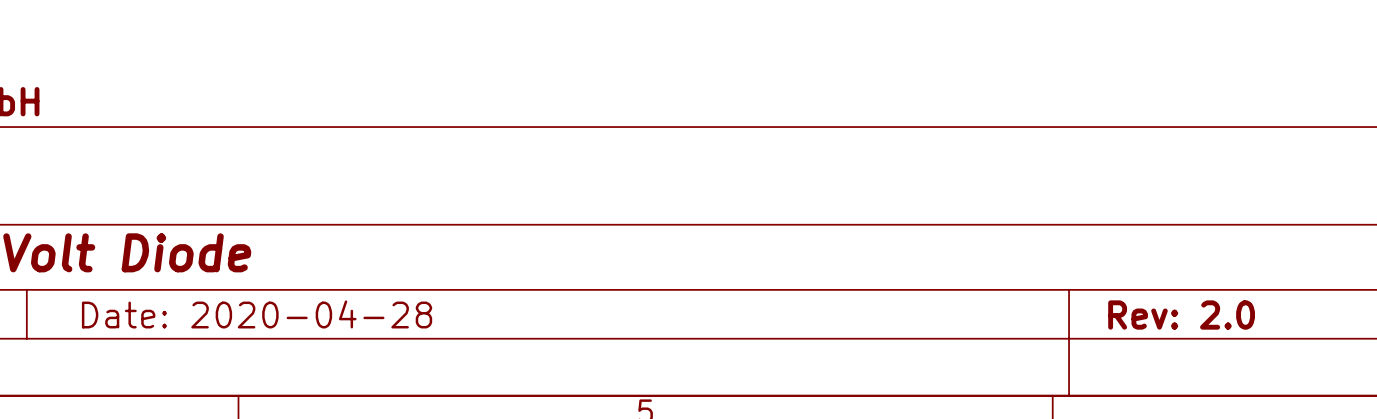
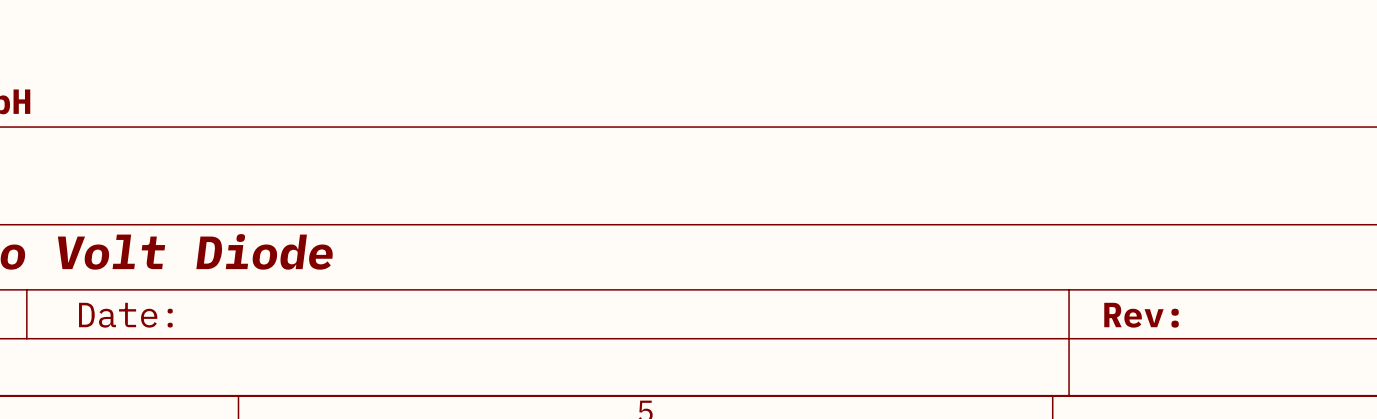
title block: Date: 2020-04-28 (257, 314) -> Date: (125, 315)
title block: Rev: 2.0 (1181, 315) -> Rev: (1141, 315)

